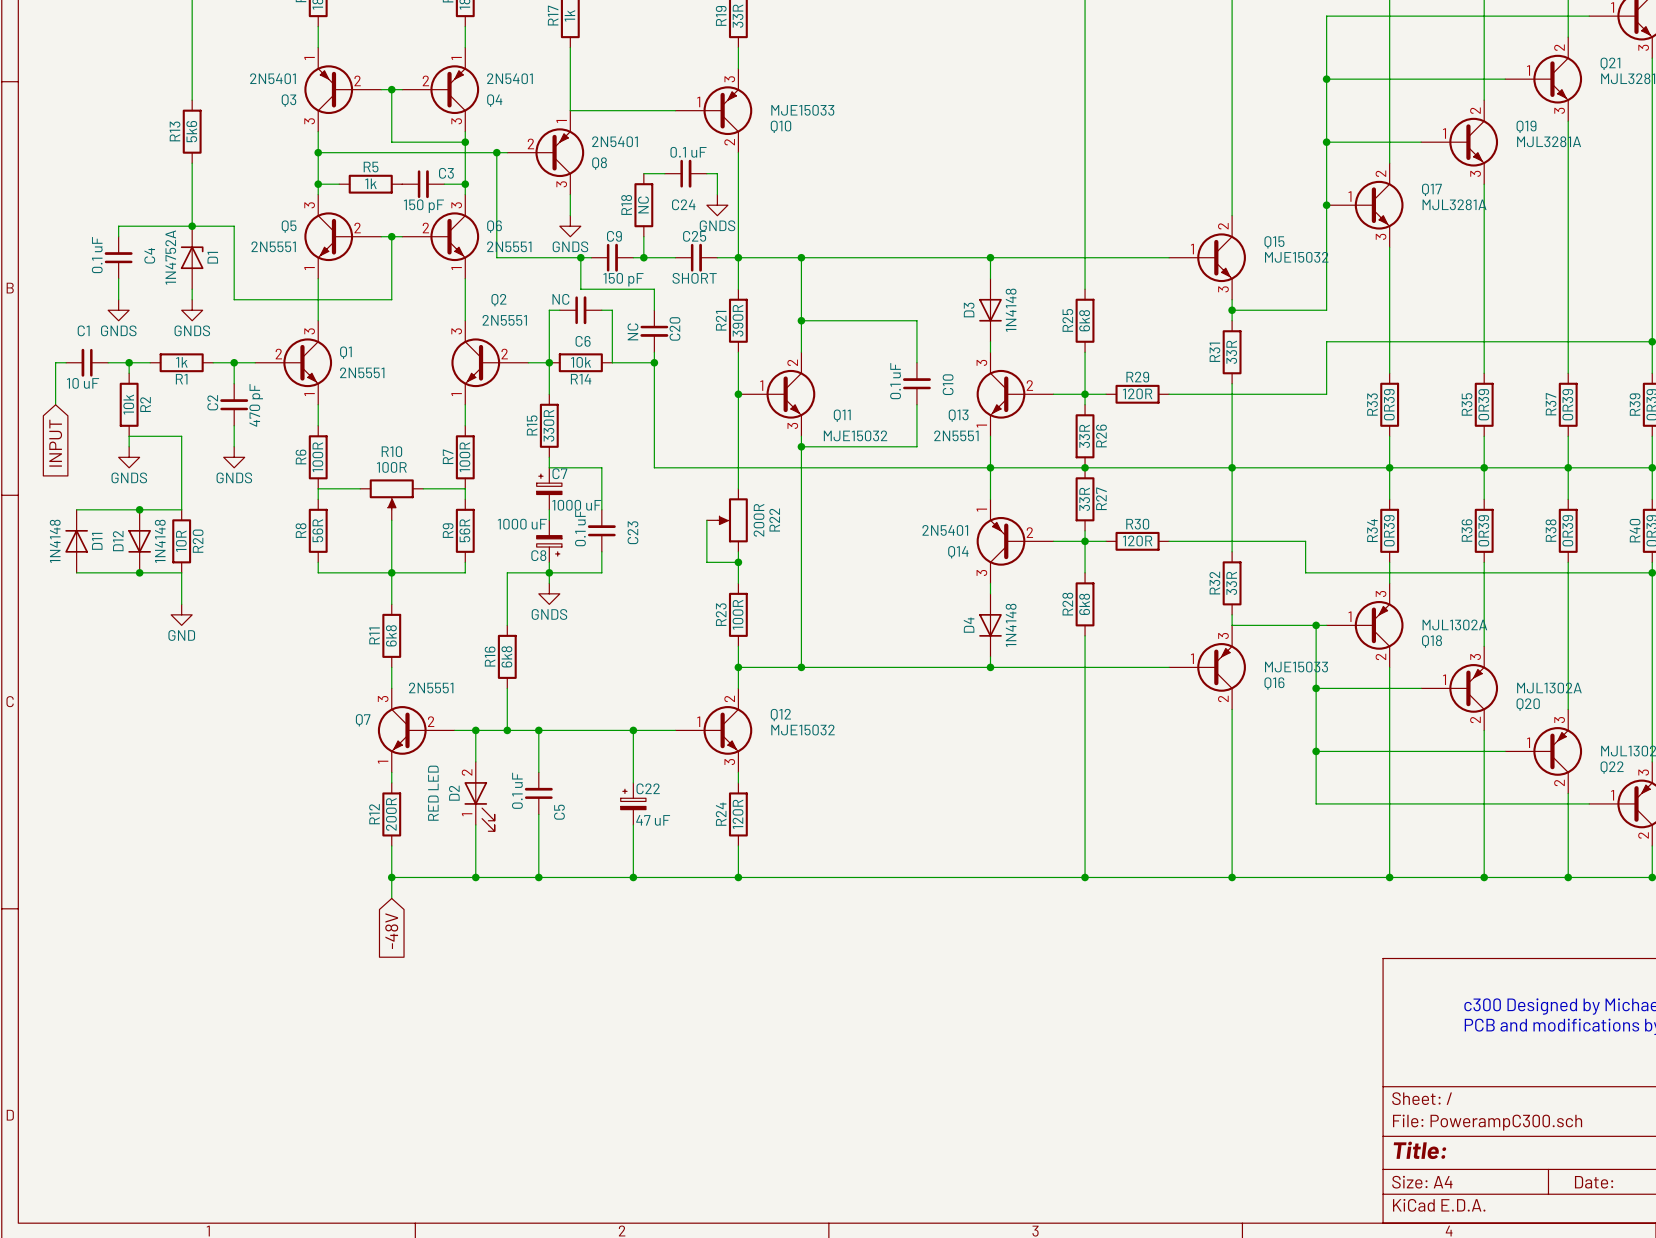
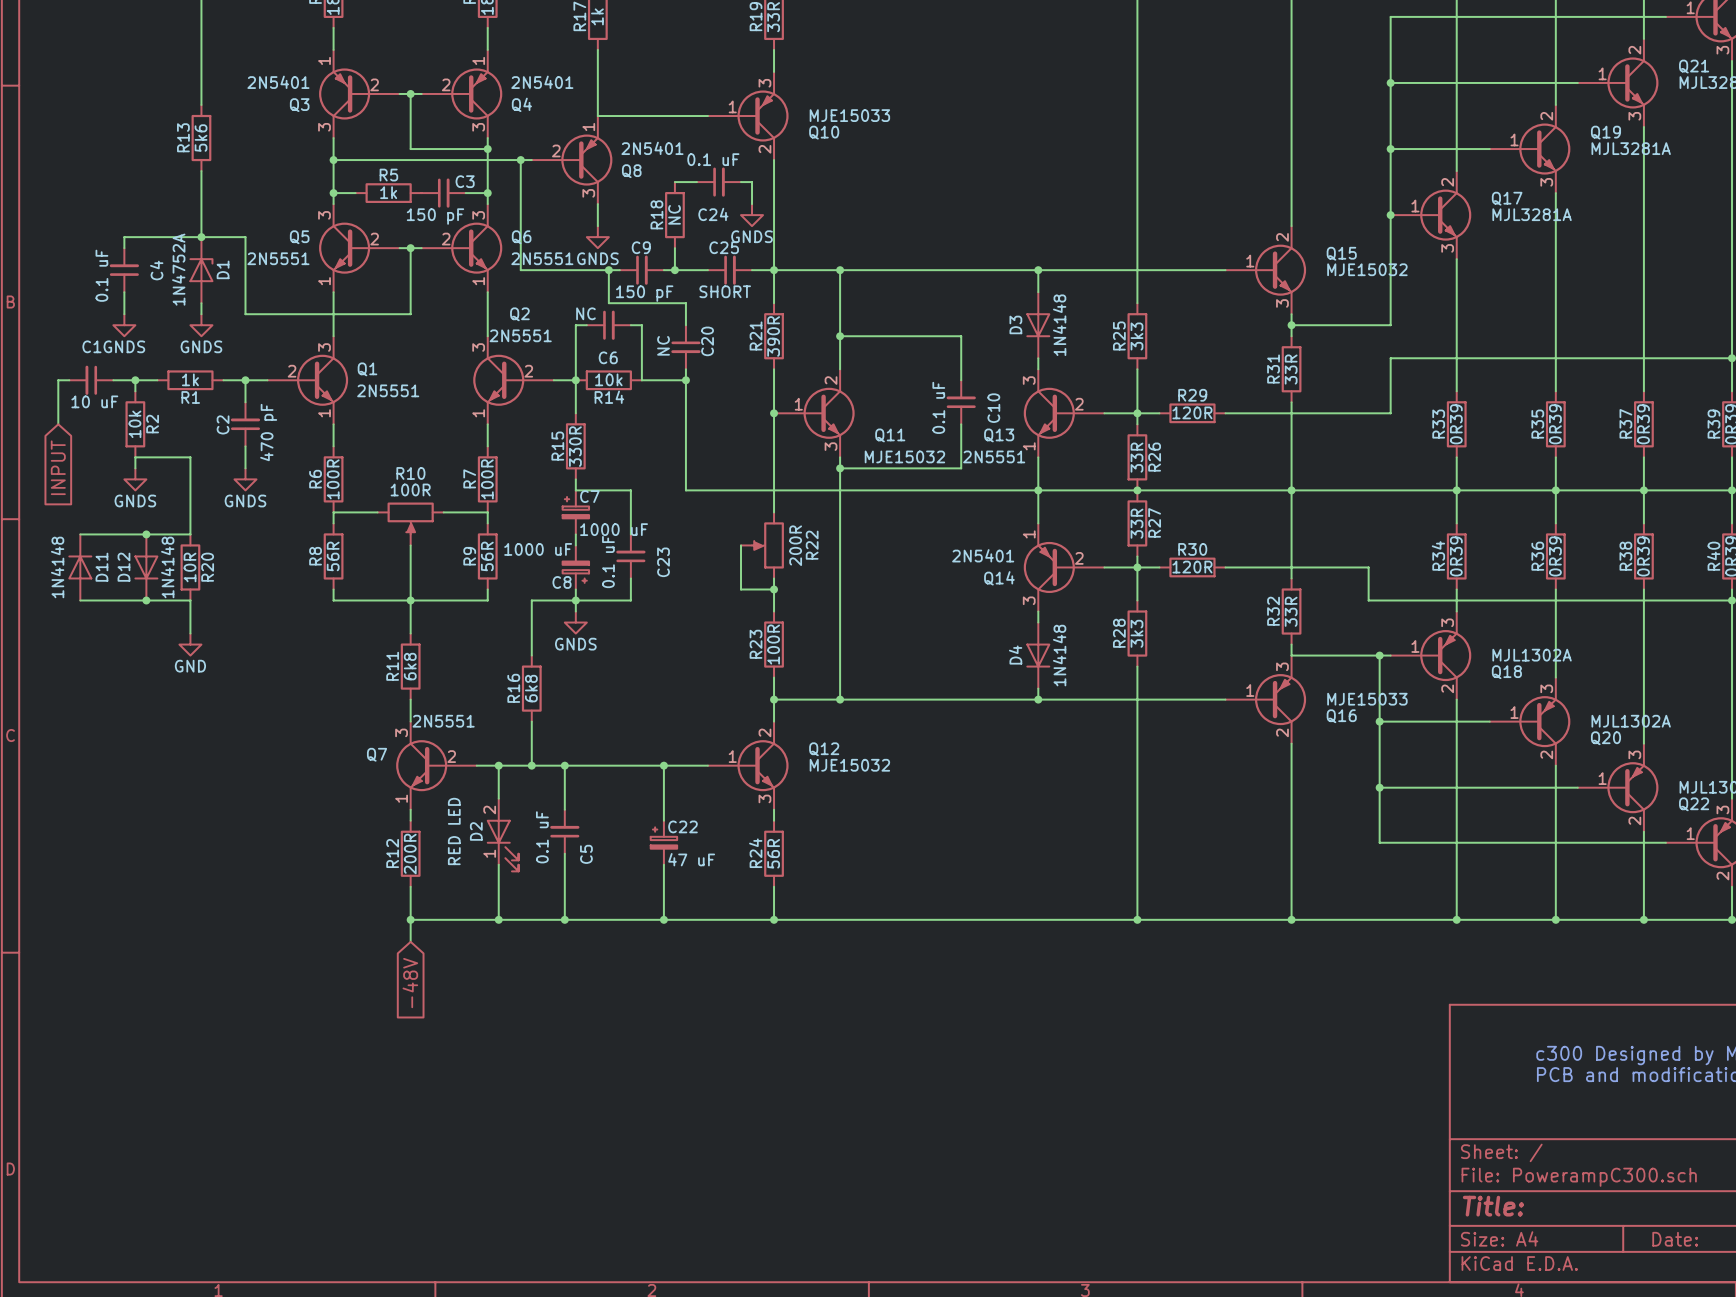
R25 value: 6k8 (1084, 320) -> 3k3 (1136, 336)
R28 value: 6k8 (1084, 604) -> 3k3 (1136, 633)
R24 value: 120R (738, 814) -> 56R (773, 853)

